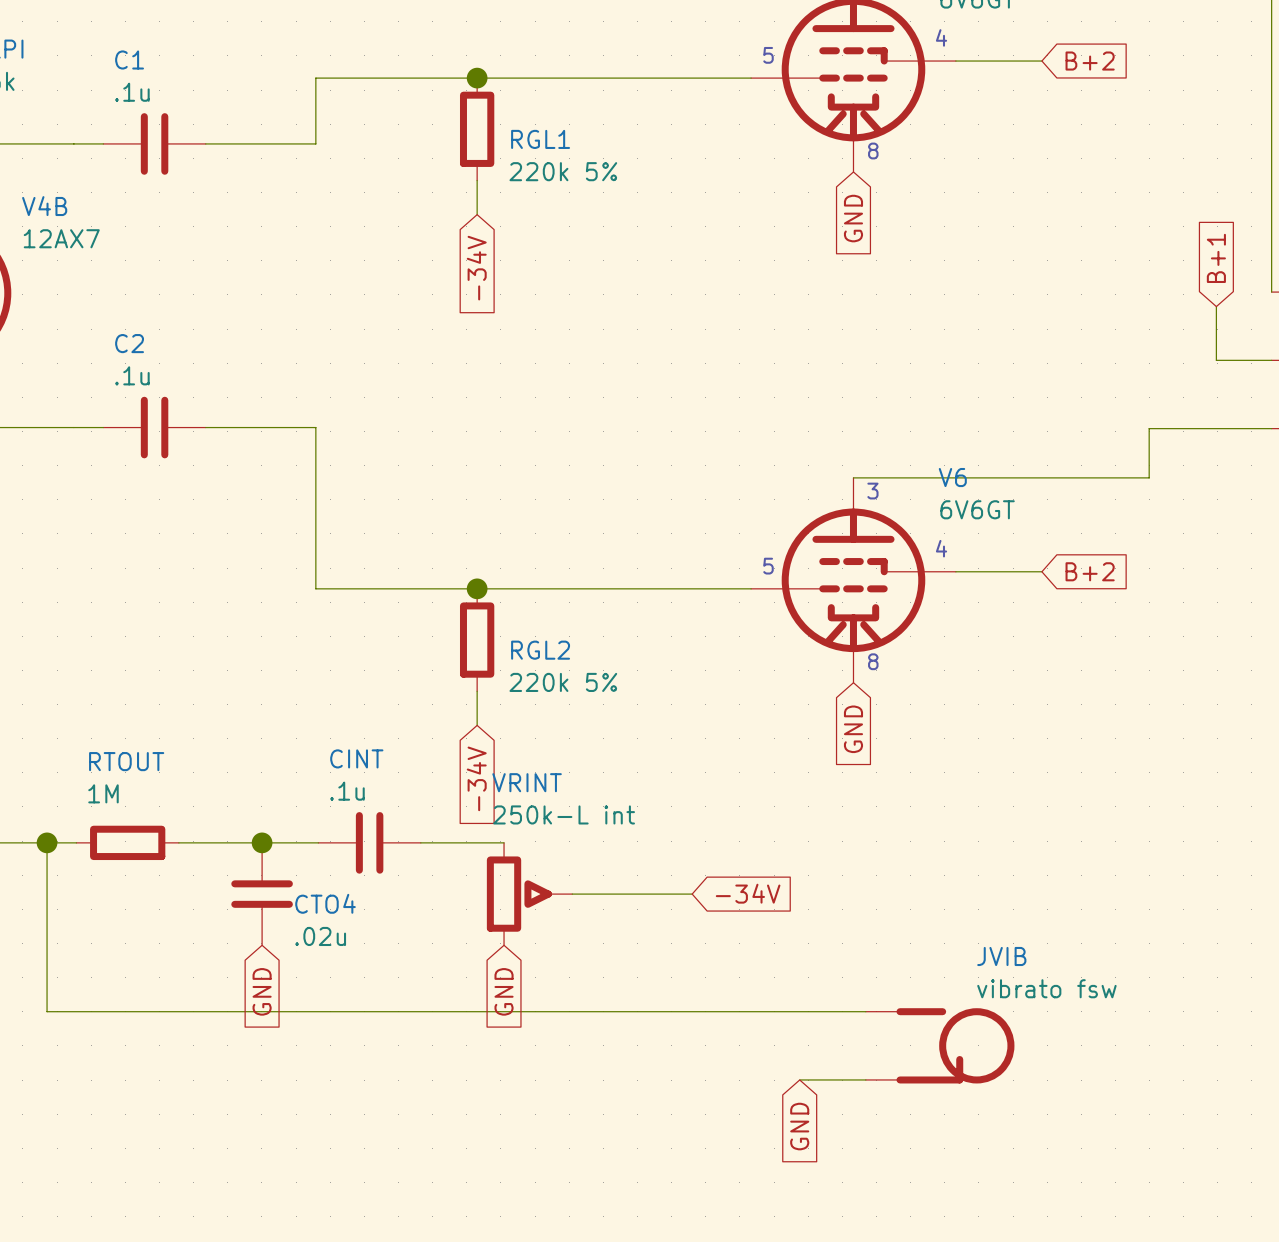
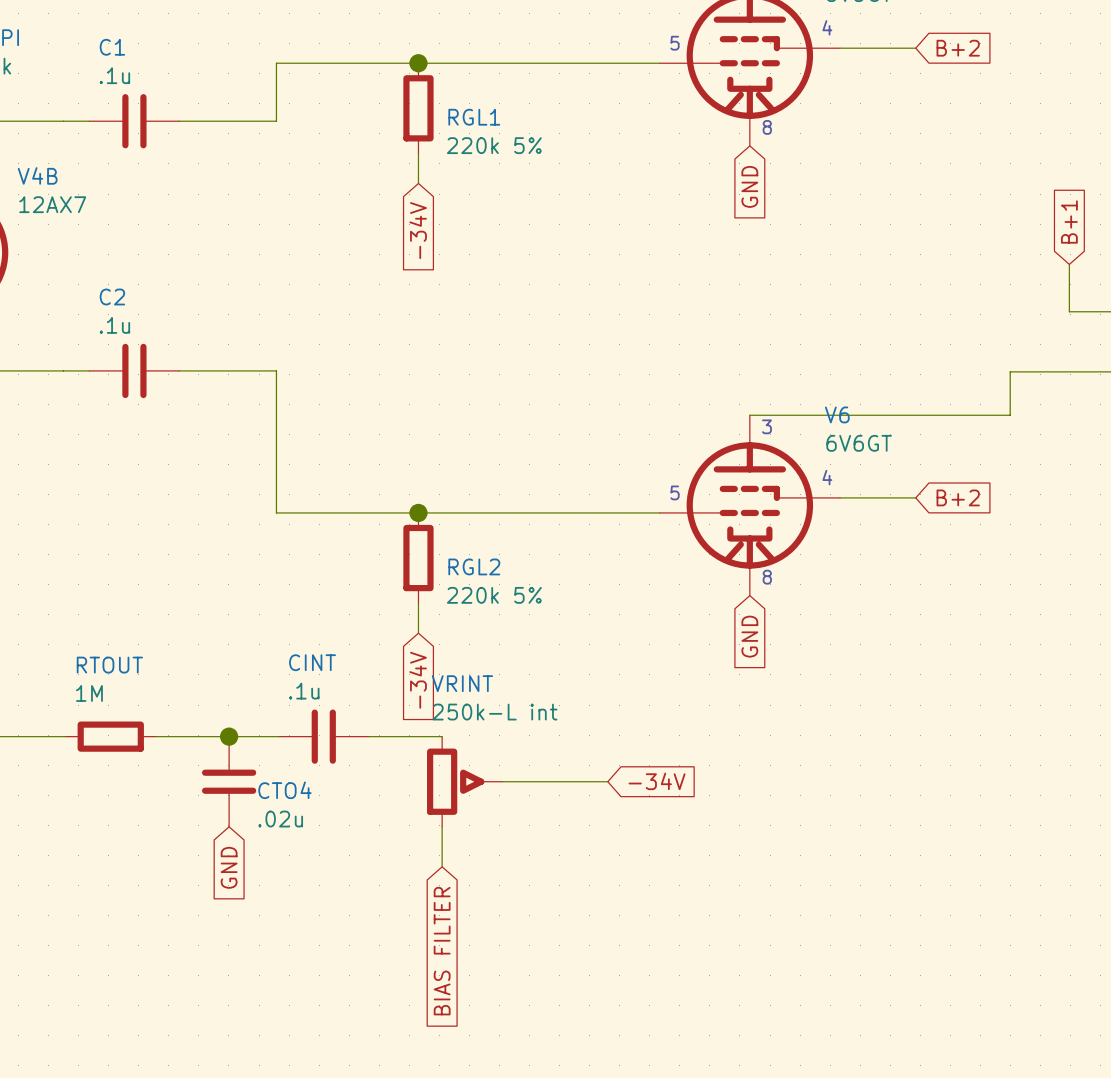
wire: (47, 842) (47, 1011) (865, 1011) -> none
junction: (47, 842) -> none
wire: none -> (442, 826) (442, 866)
global label: GND (504, 991) -> none
JVIB: vibrato fsw (940, 1045) -> none
wire: (799, 1079) (865, 1079) -> none
global label: none -> BIAS FILTER (442, 951)
global label: GND (799, 1126) -> none

